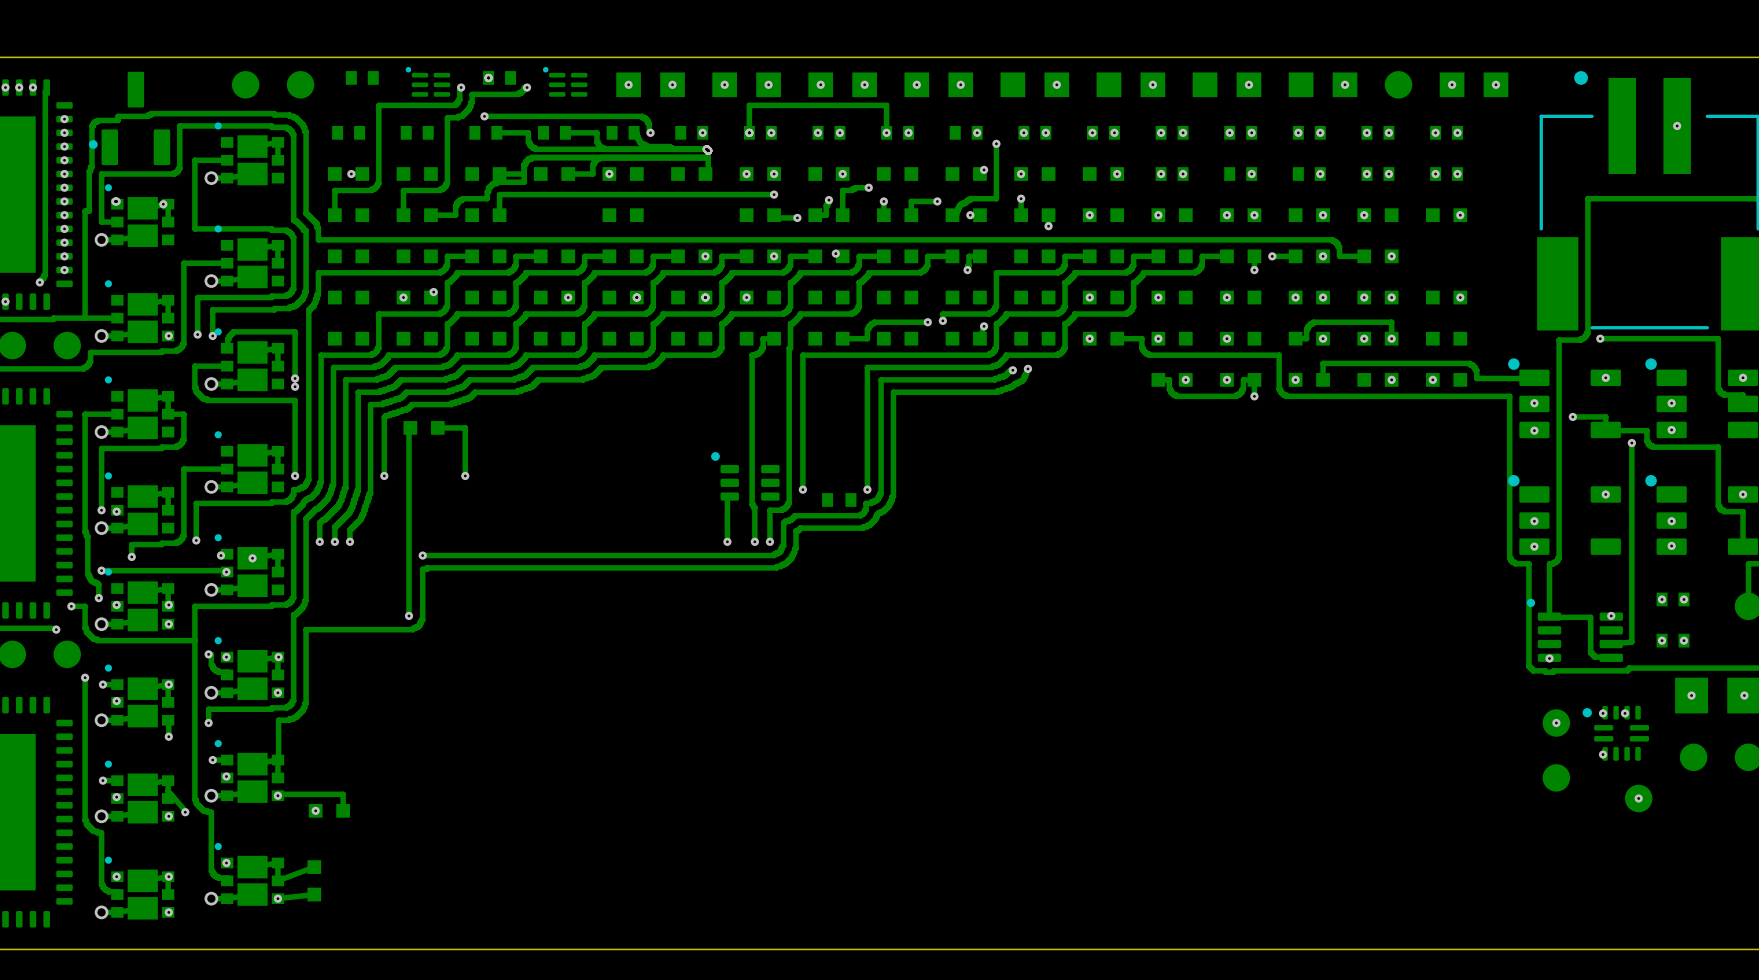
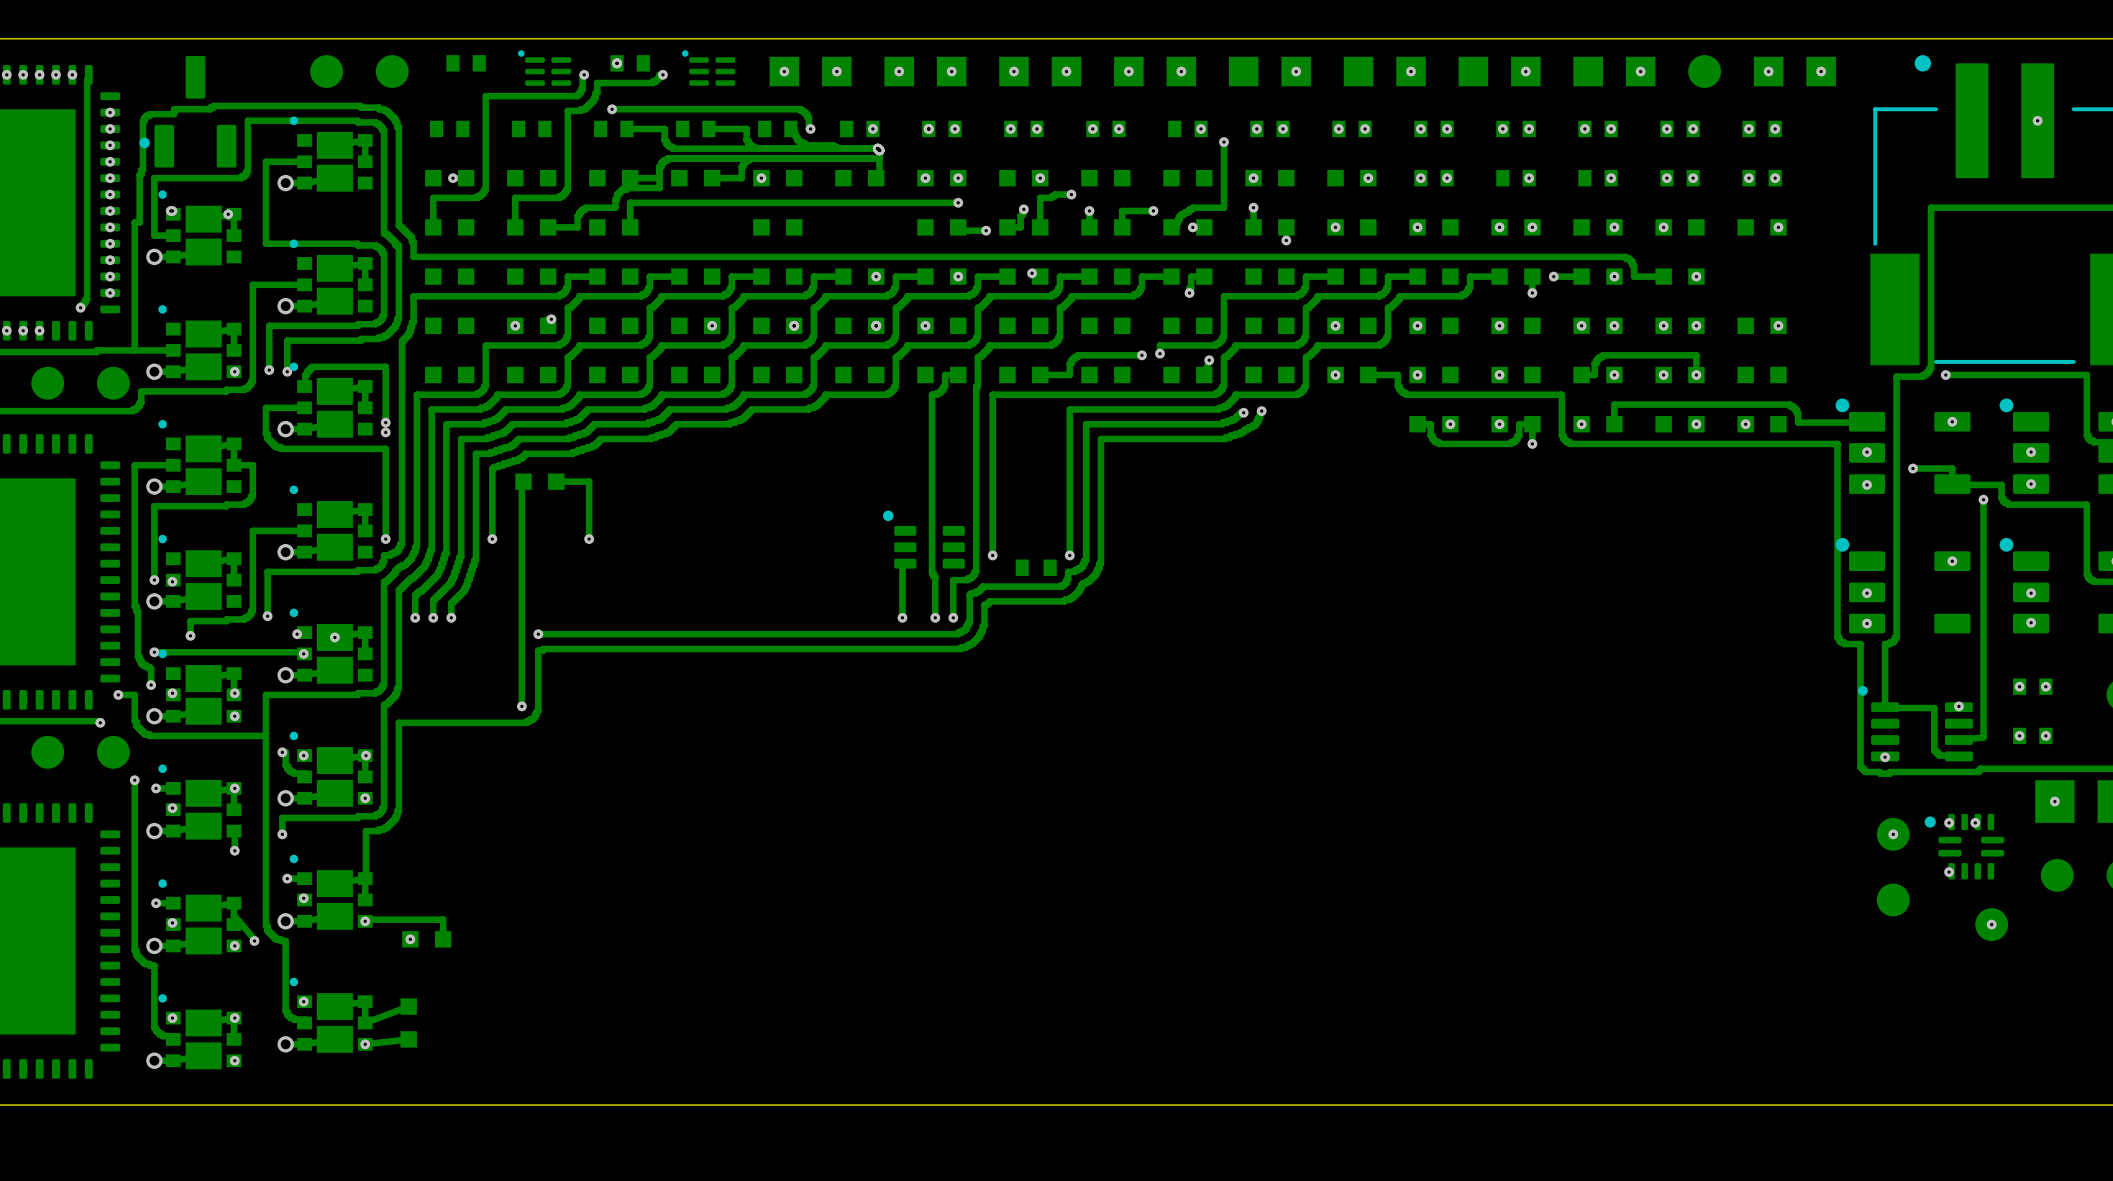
track: (886, 132) (886, 105) (749, 105) (749, 132) -> none
via: (984, 169) -> none

